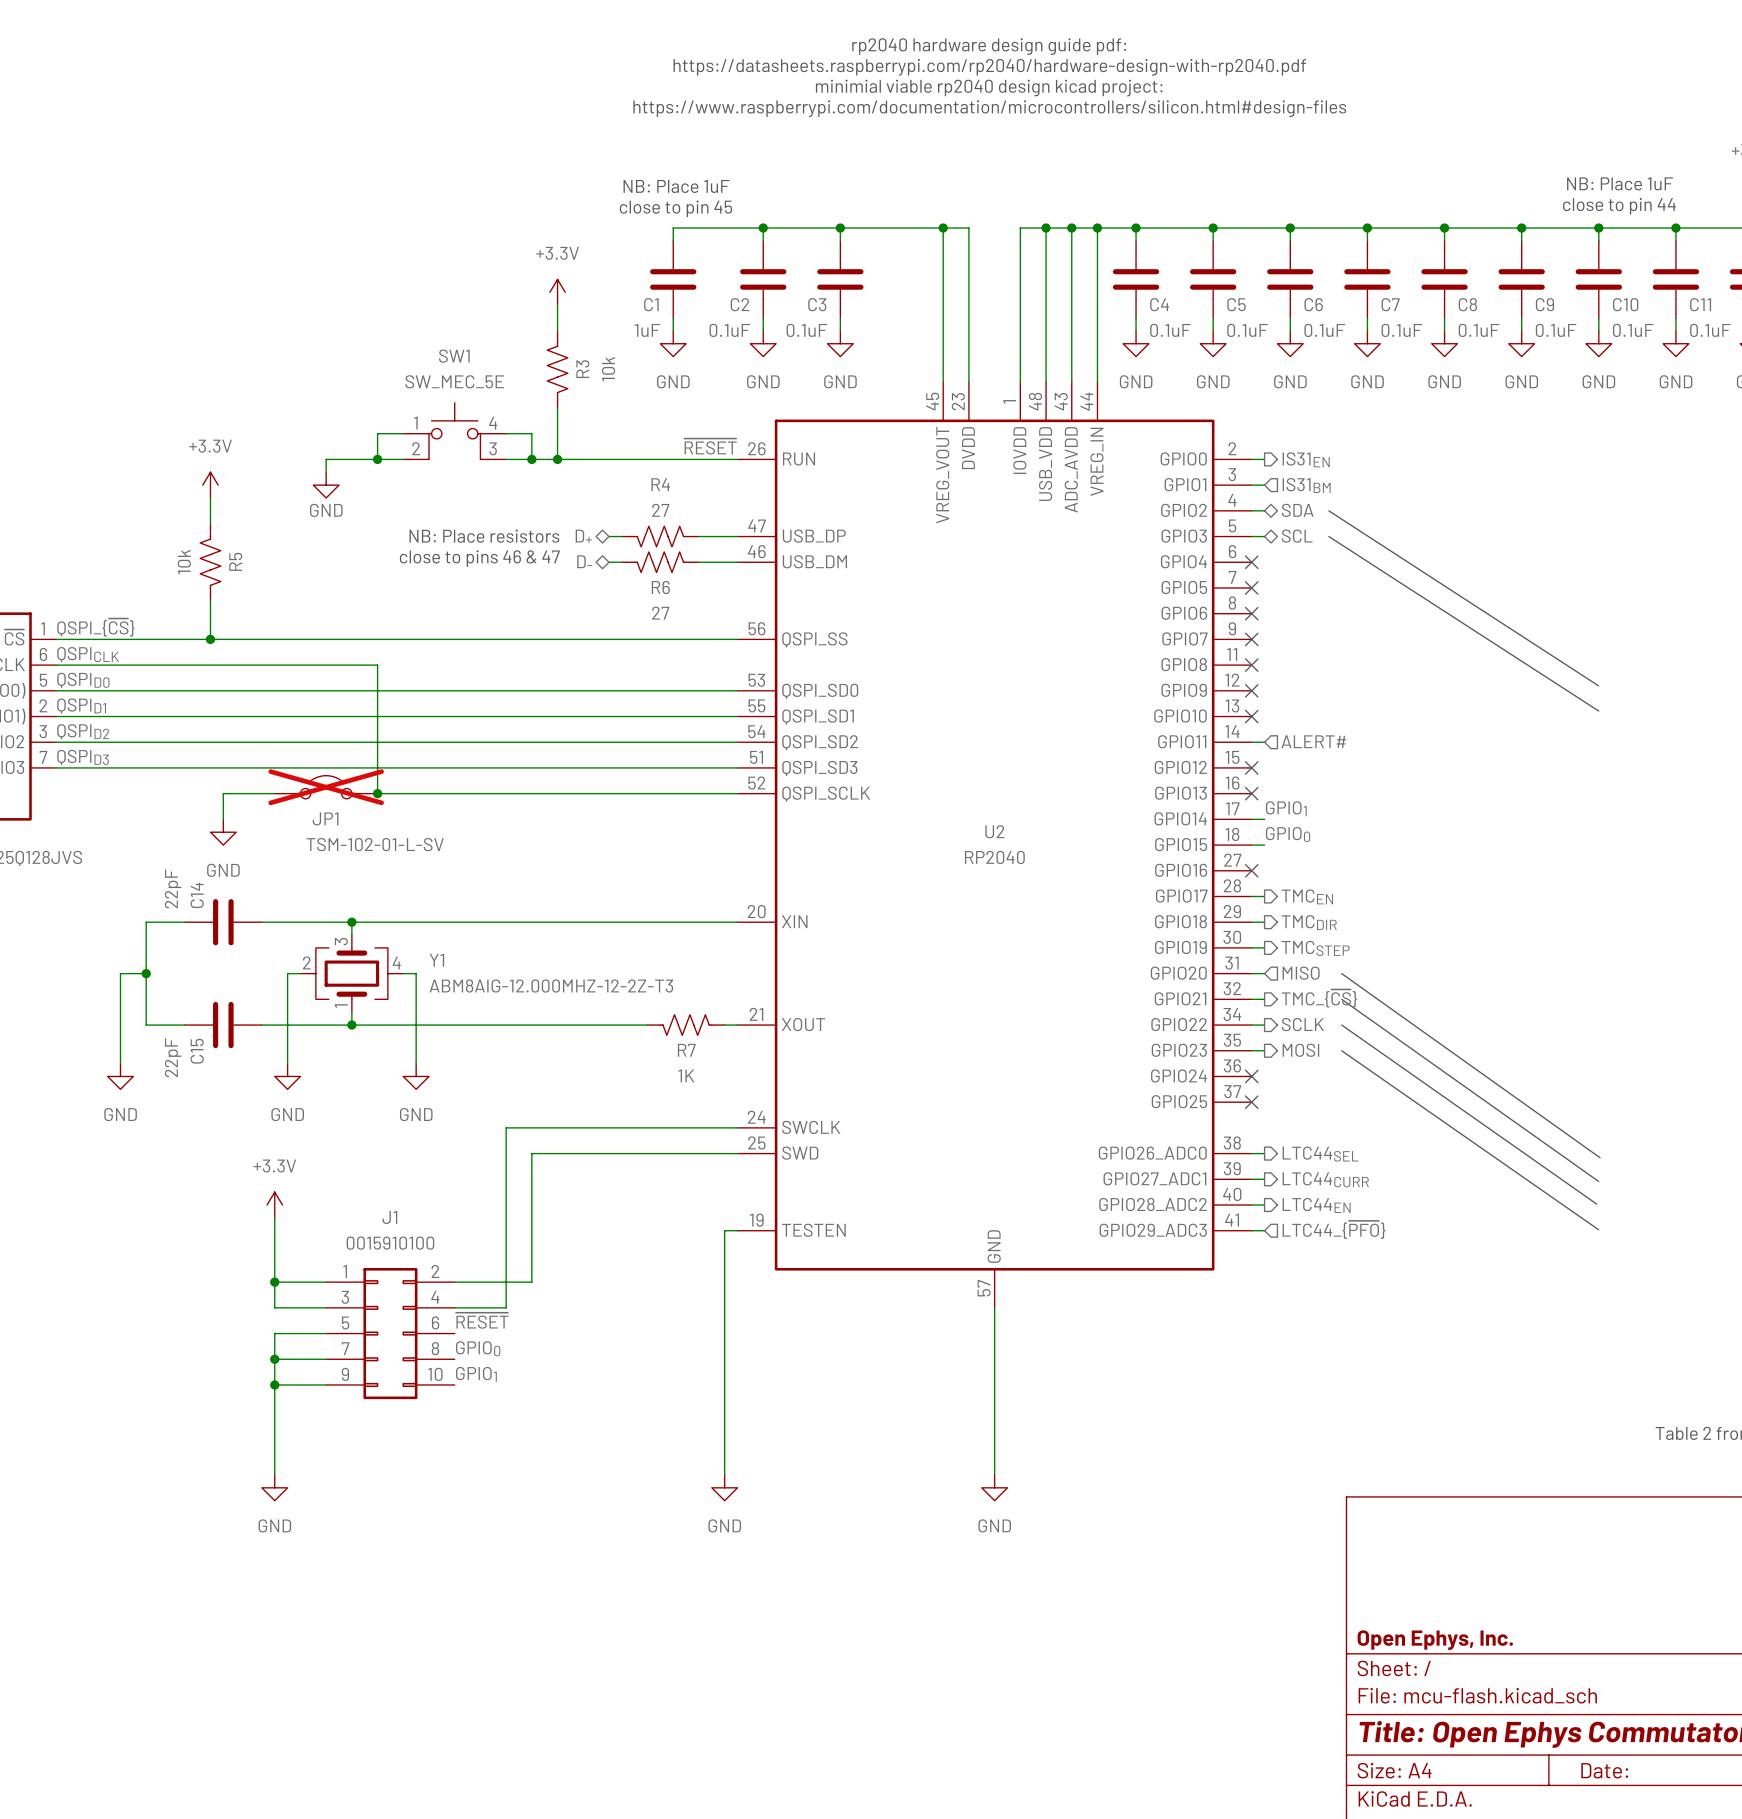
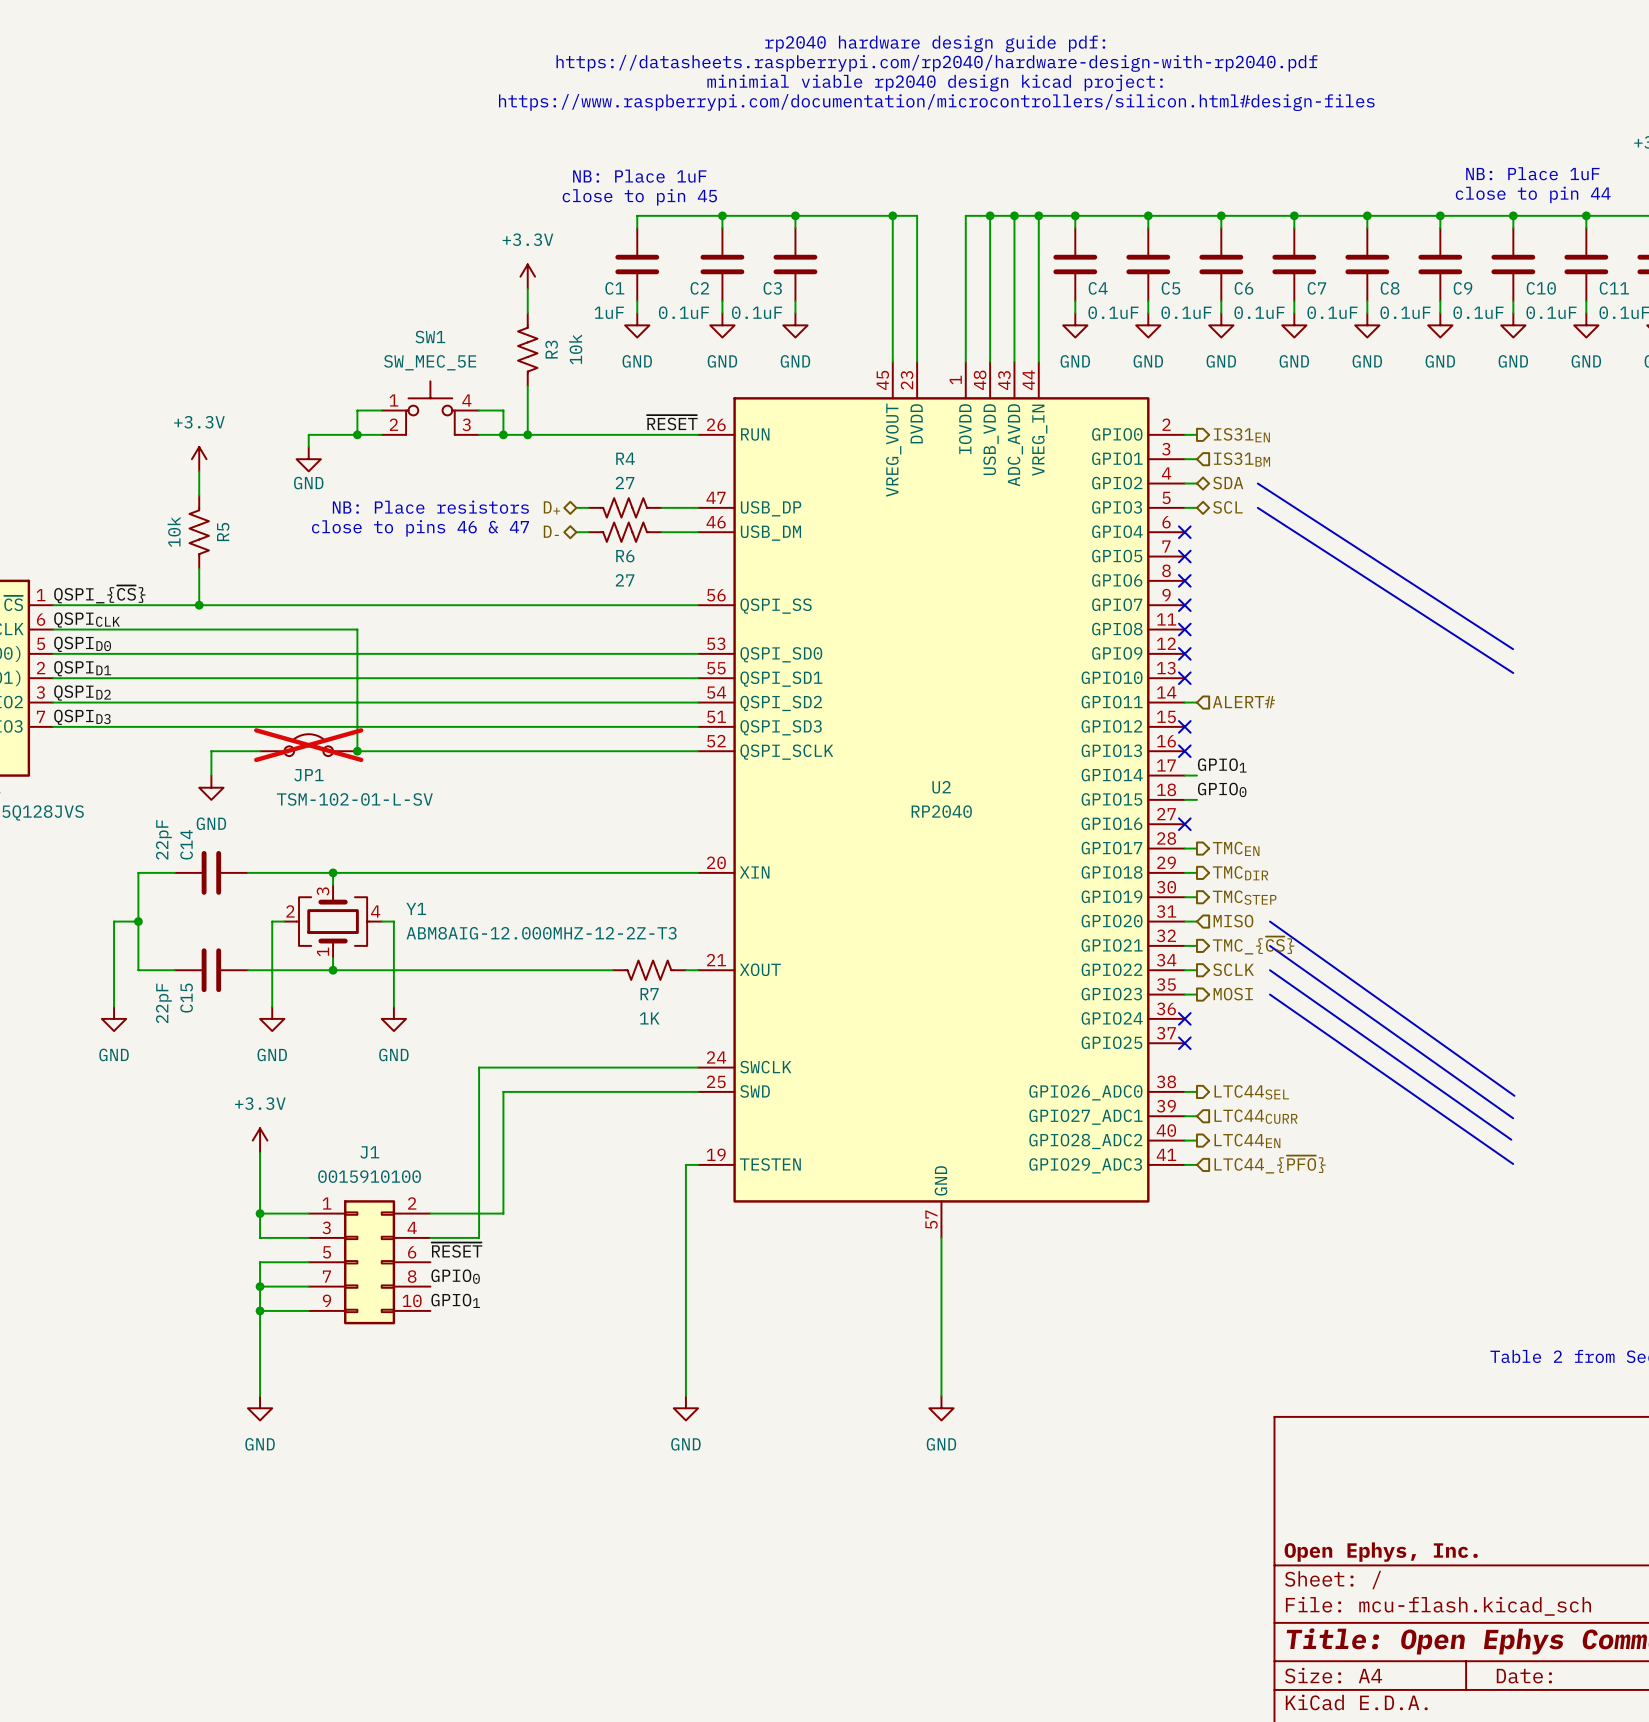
hierarchical label shape: output (1325, 1179) -> input (1256, 1116)

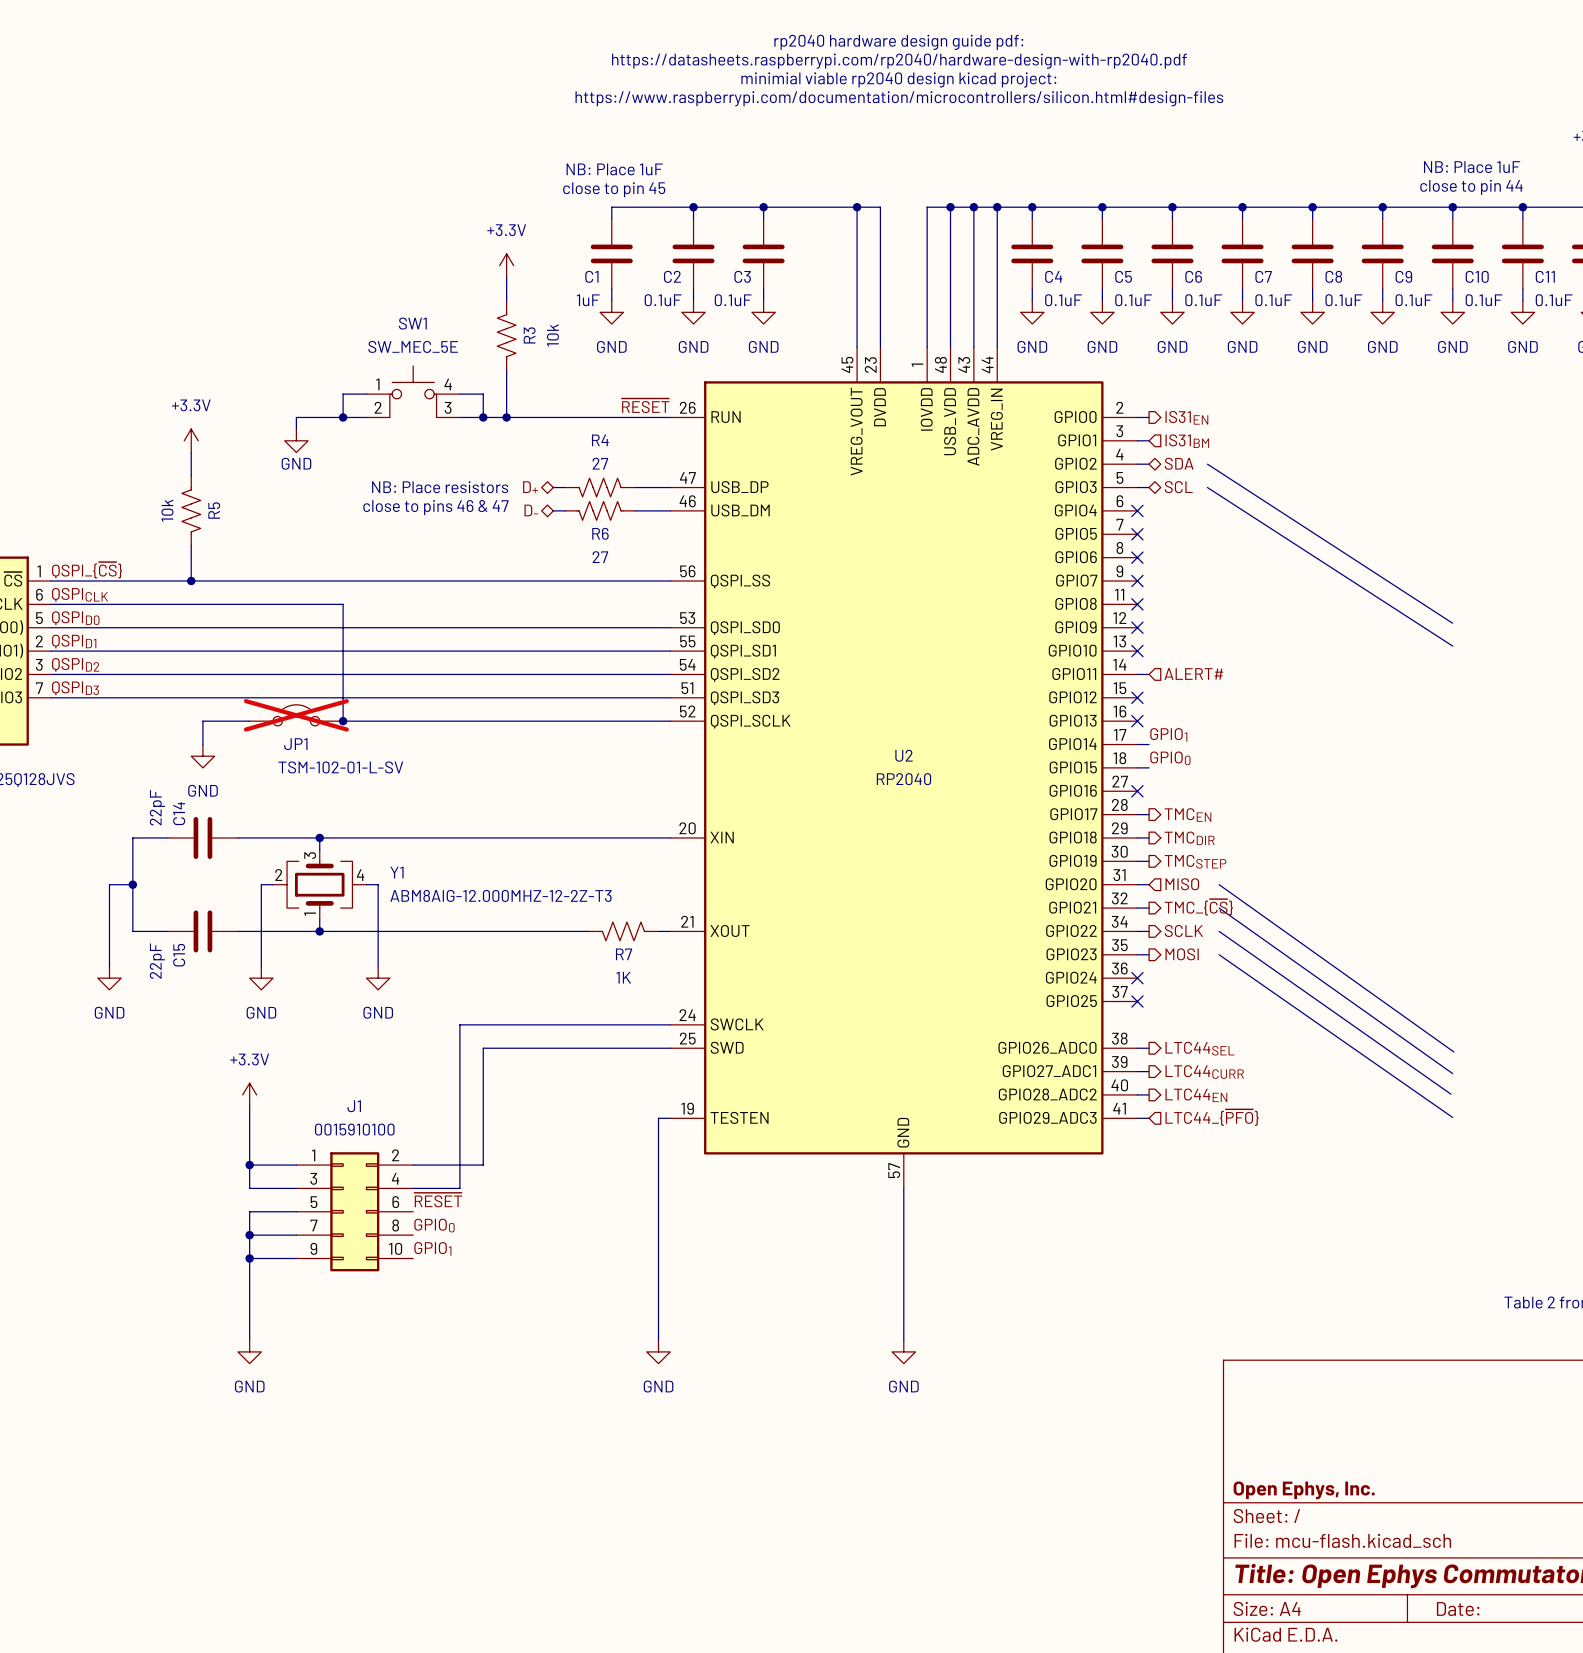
hierarchical label shape: input (1256, 1116) -> output (1204, 1072)

